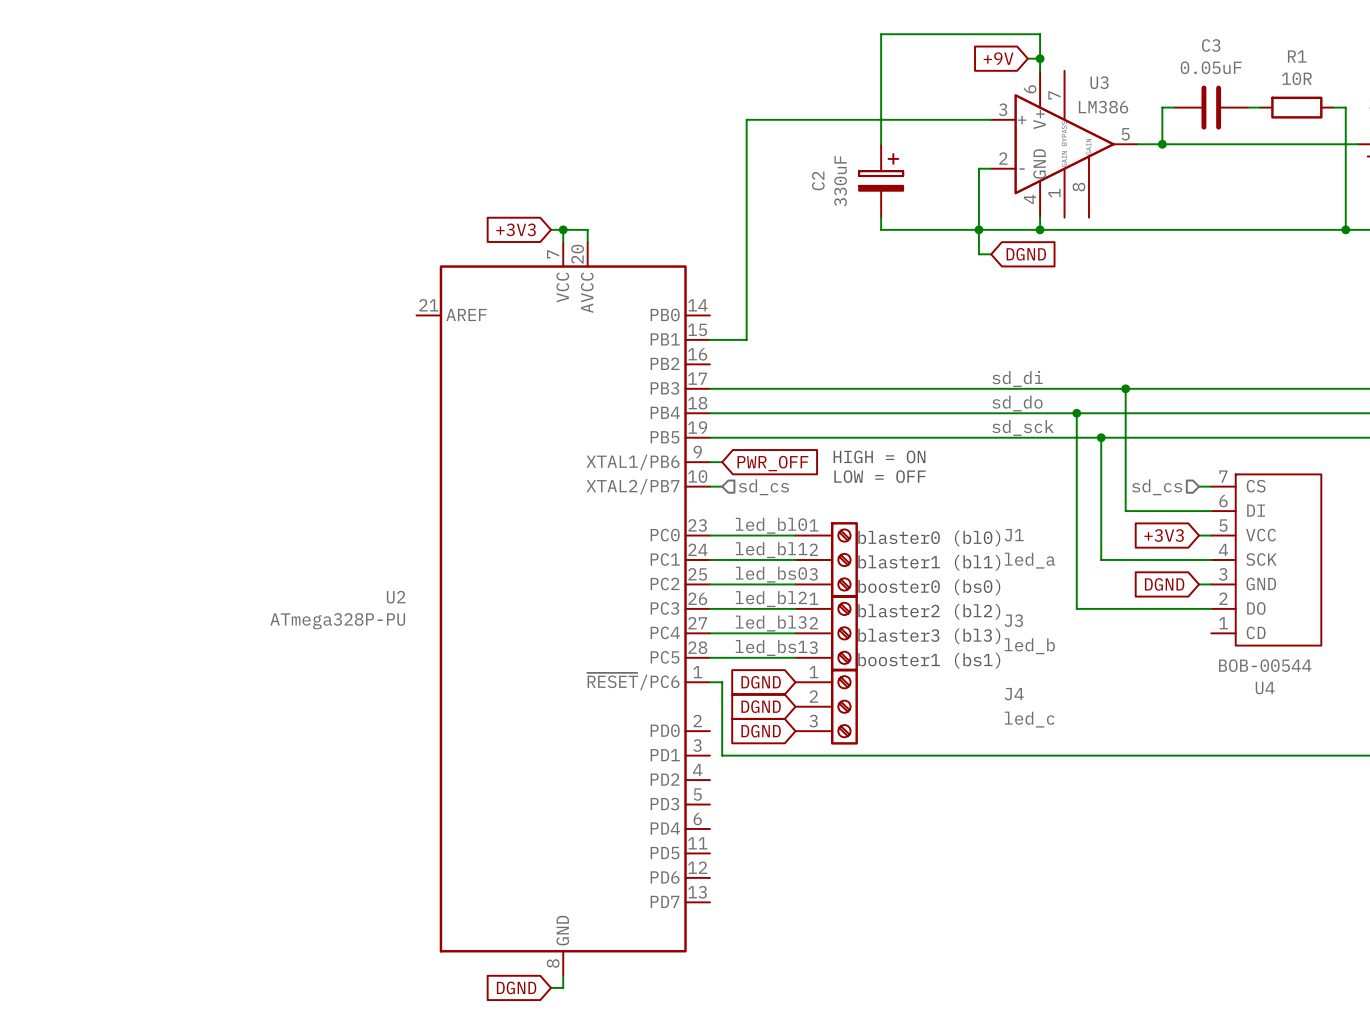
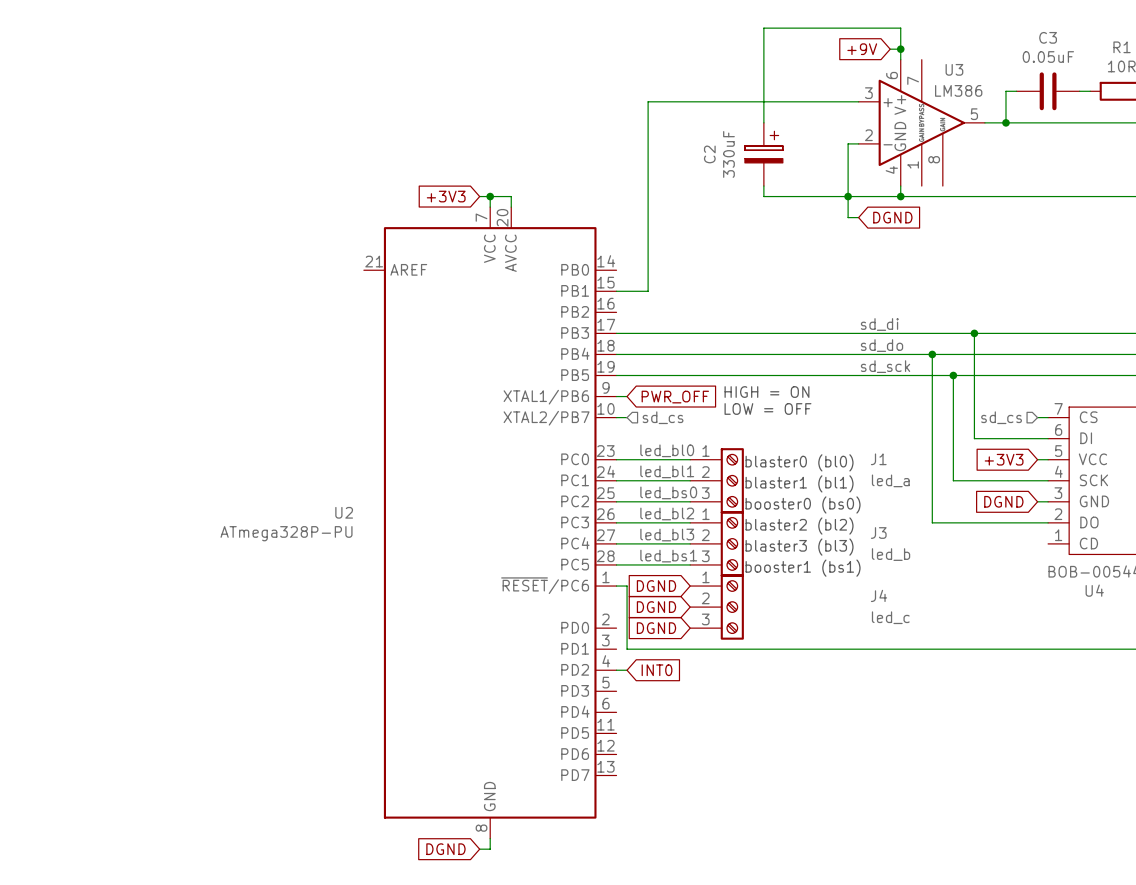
wire: none -> (616, 670) (627, 670)
global label: none -> INT0 (657, 670)

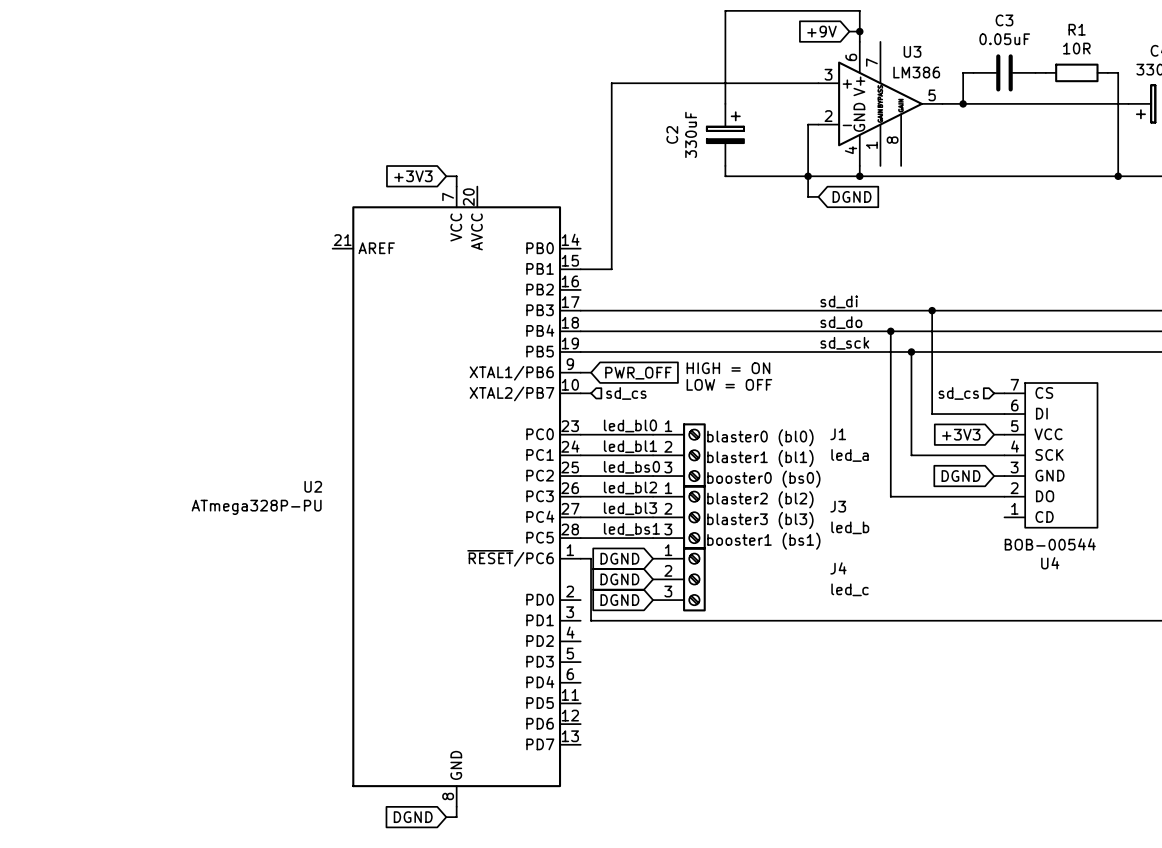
wire: (490, 196) (511, 196) (511, 207) -> none
junction: (490, 196) -> none
wire: (616, 670) (627, 670) -> none
global label: INT0 (657, 670) -> none

